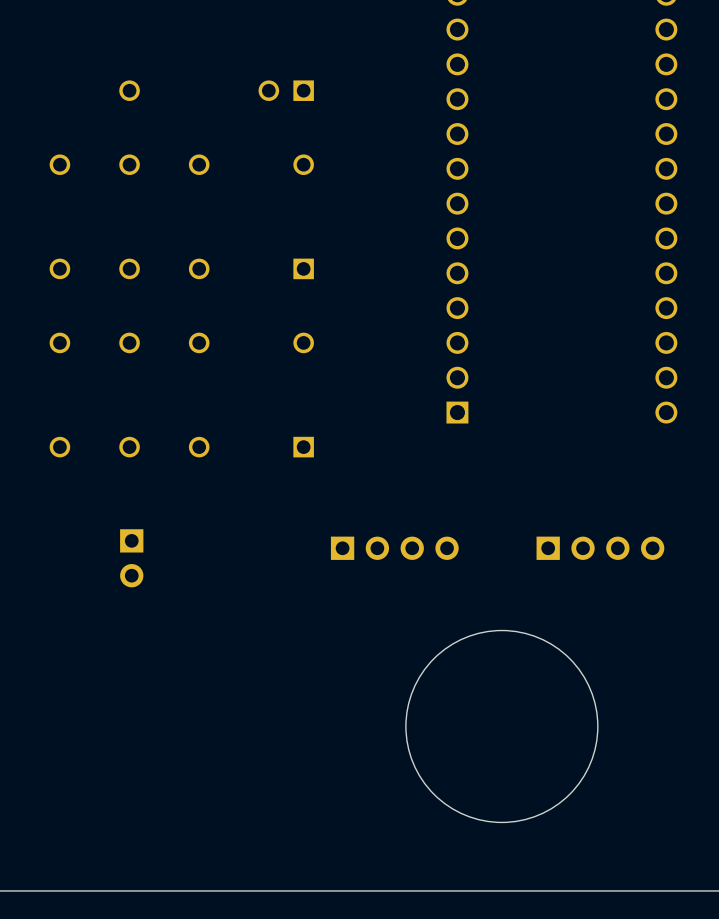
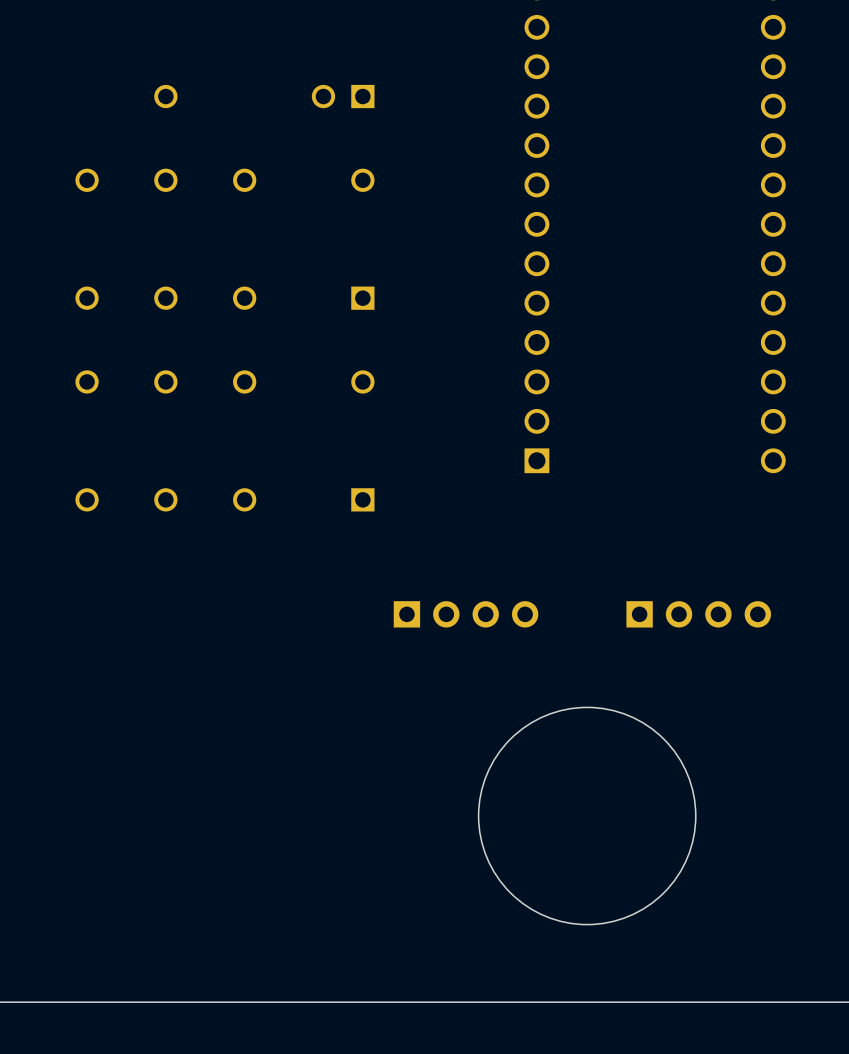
part: (131, 558) -> none

